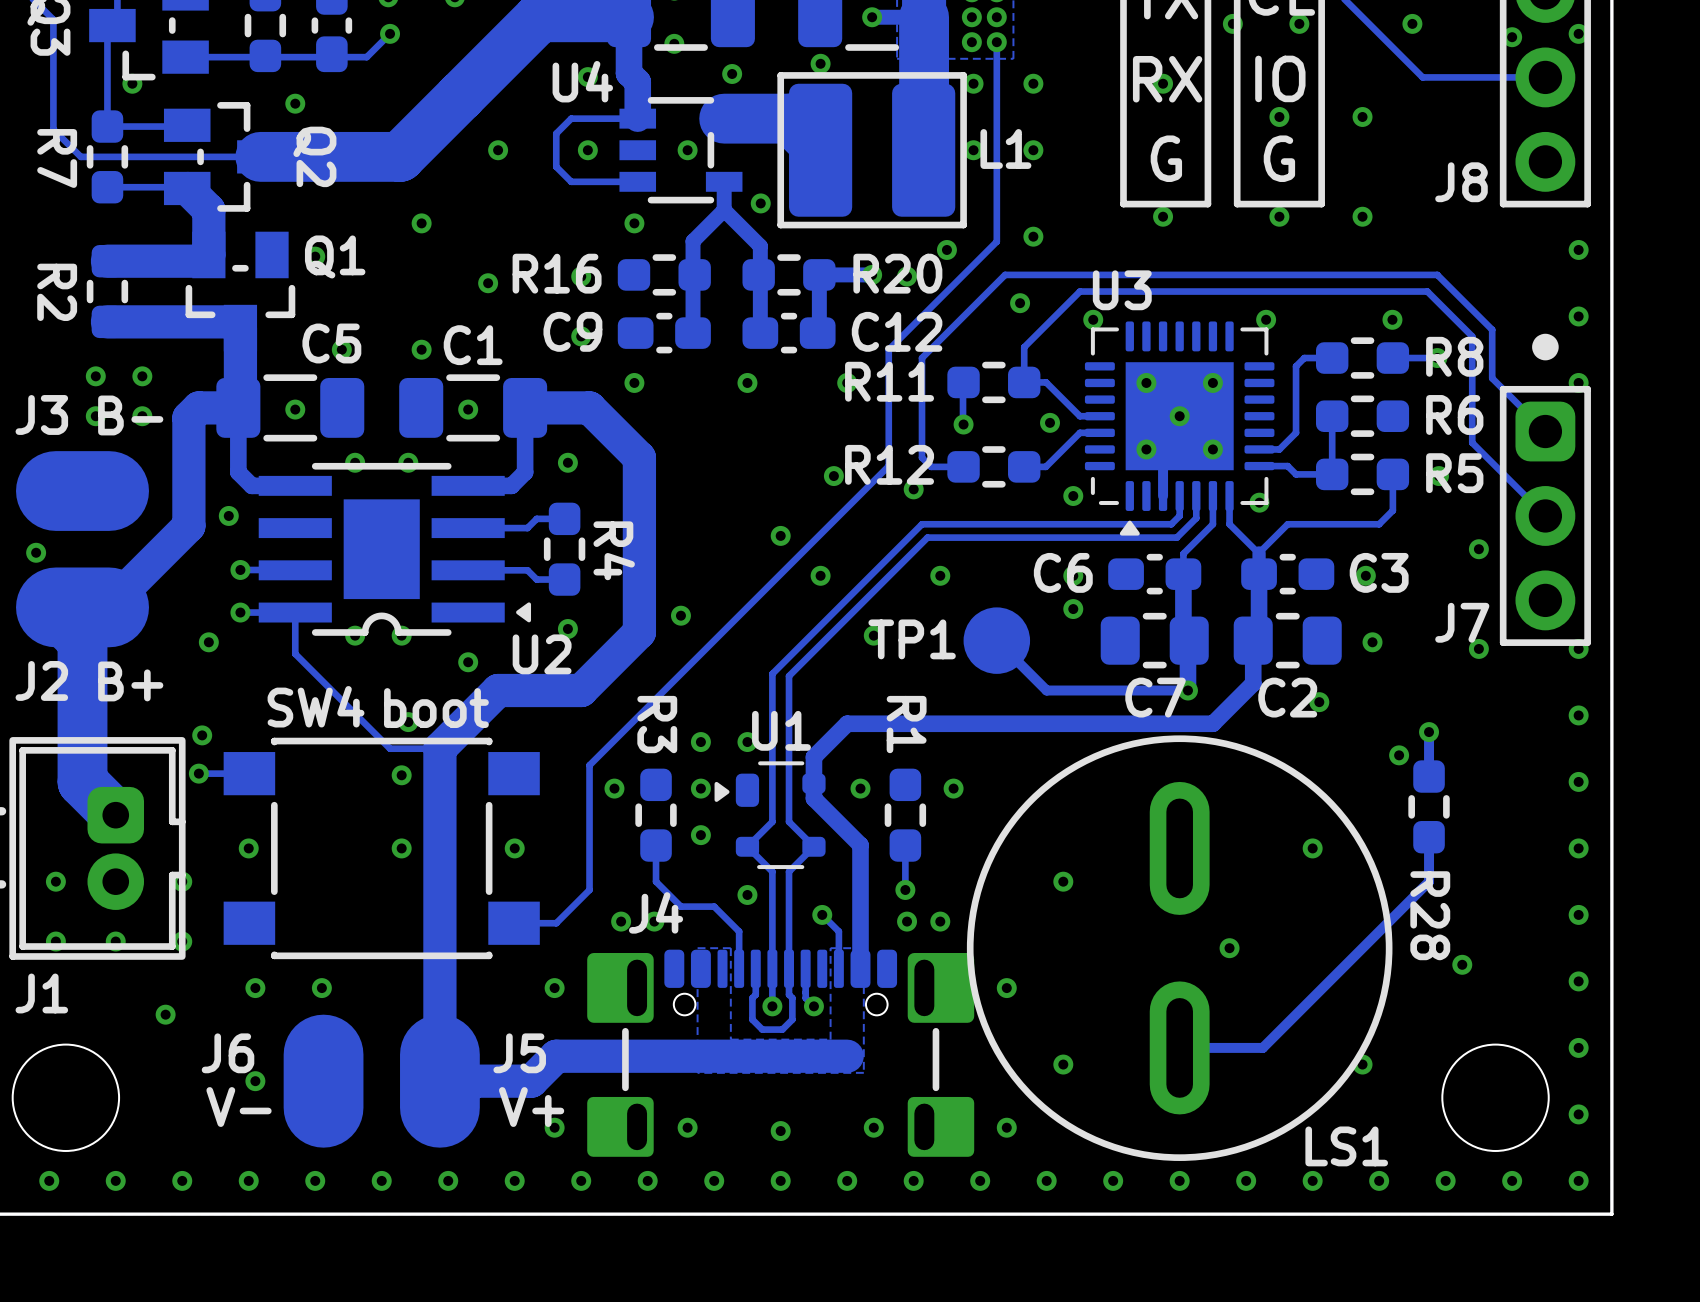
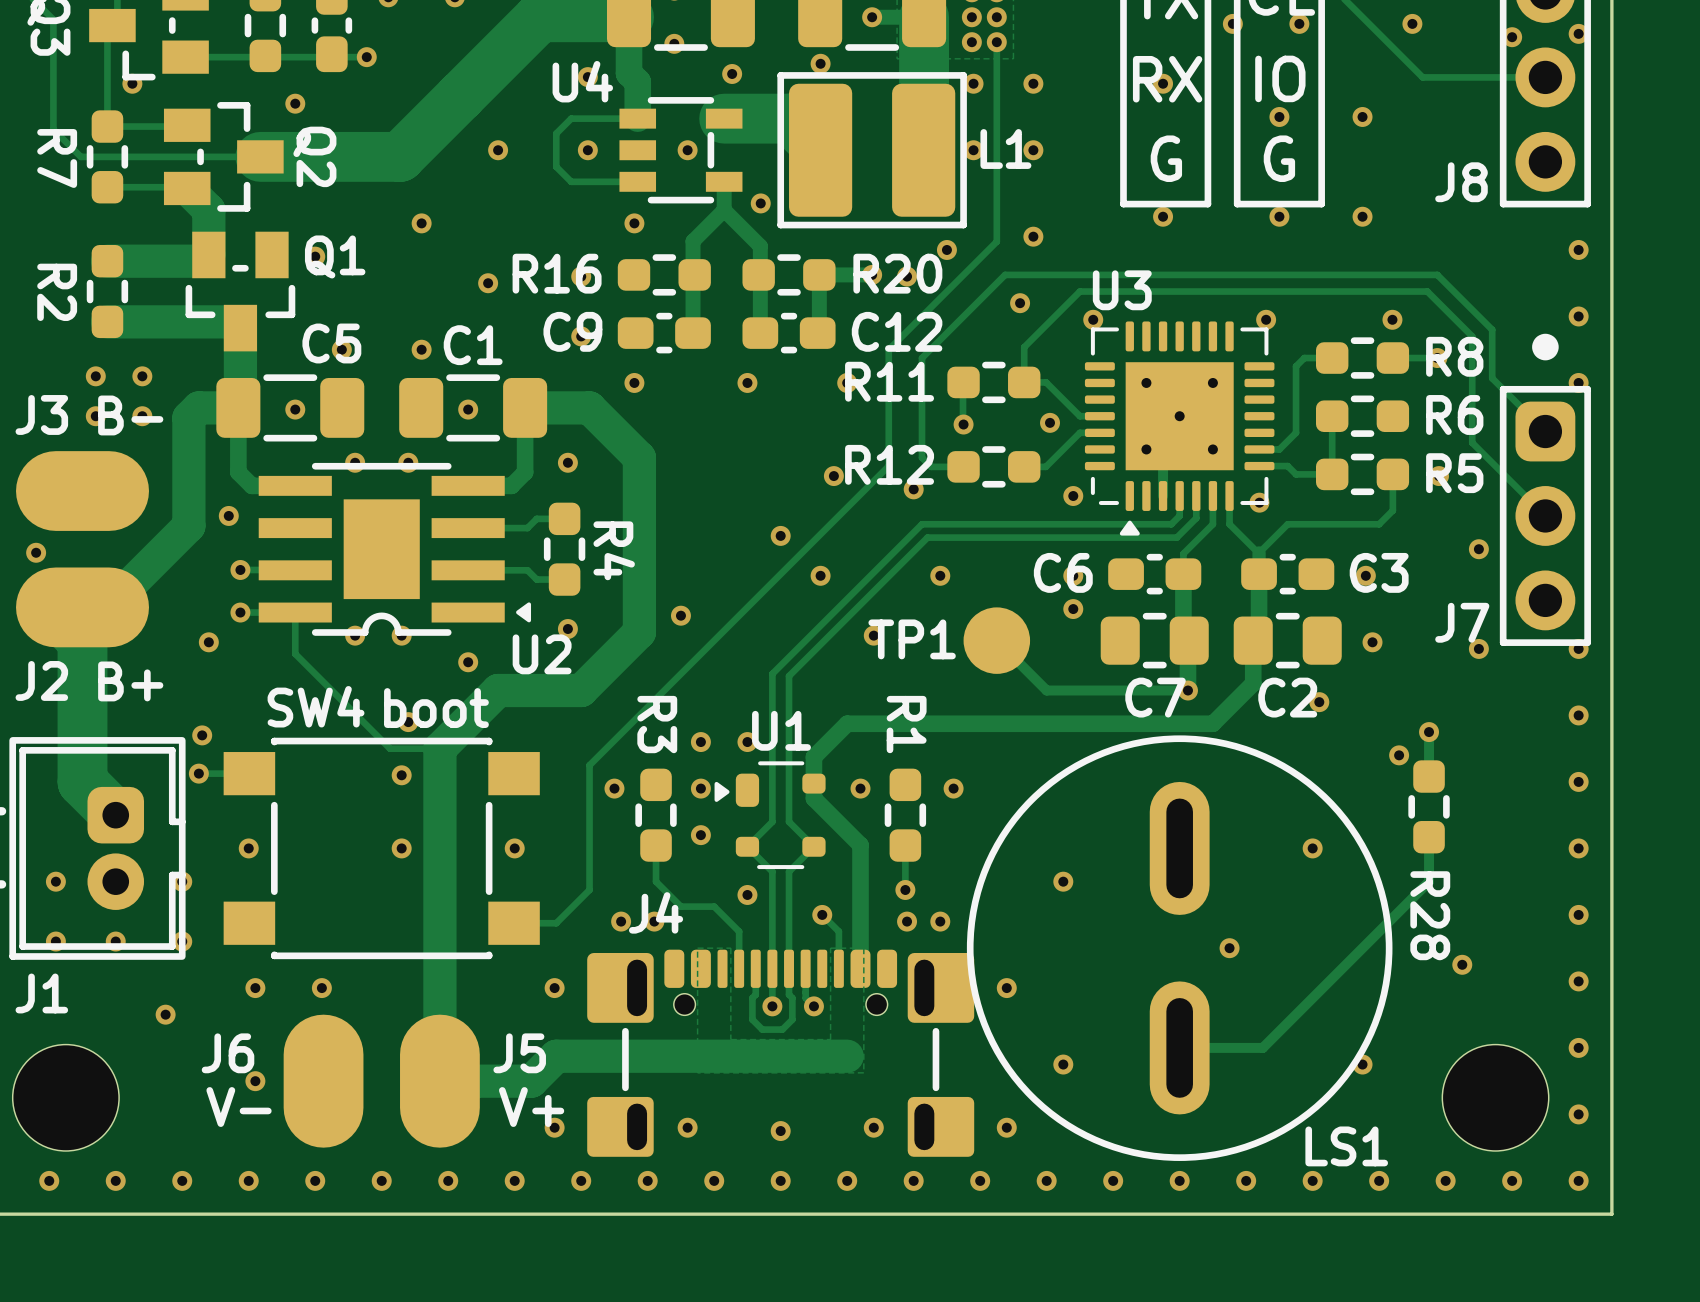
track: (390, 33) (366, 57) -> none
via position: (390, 33) -> (366, 57)

